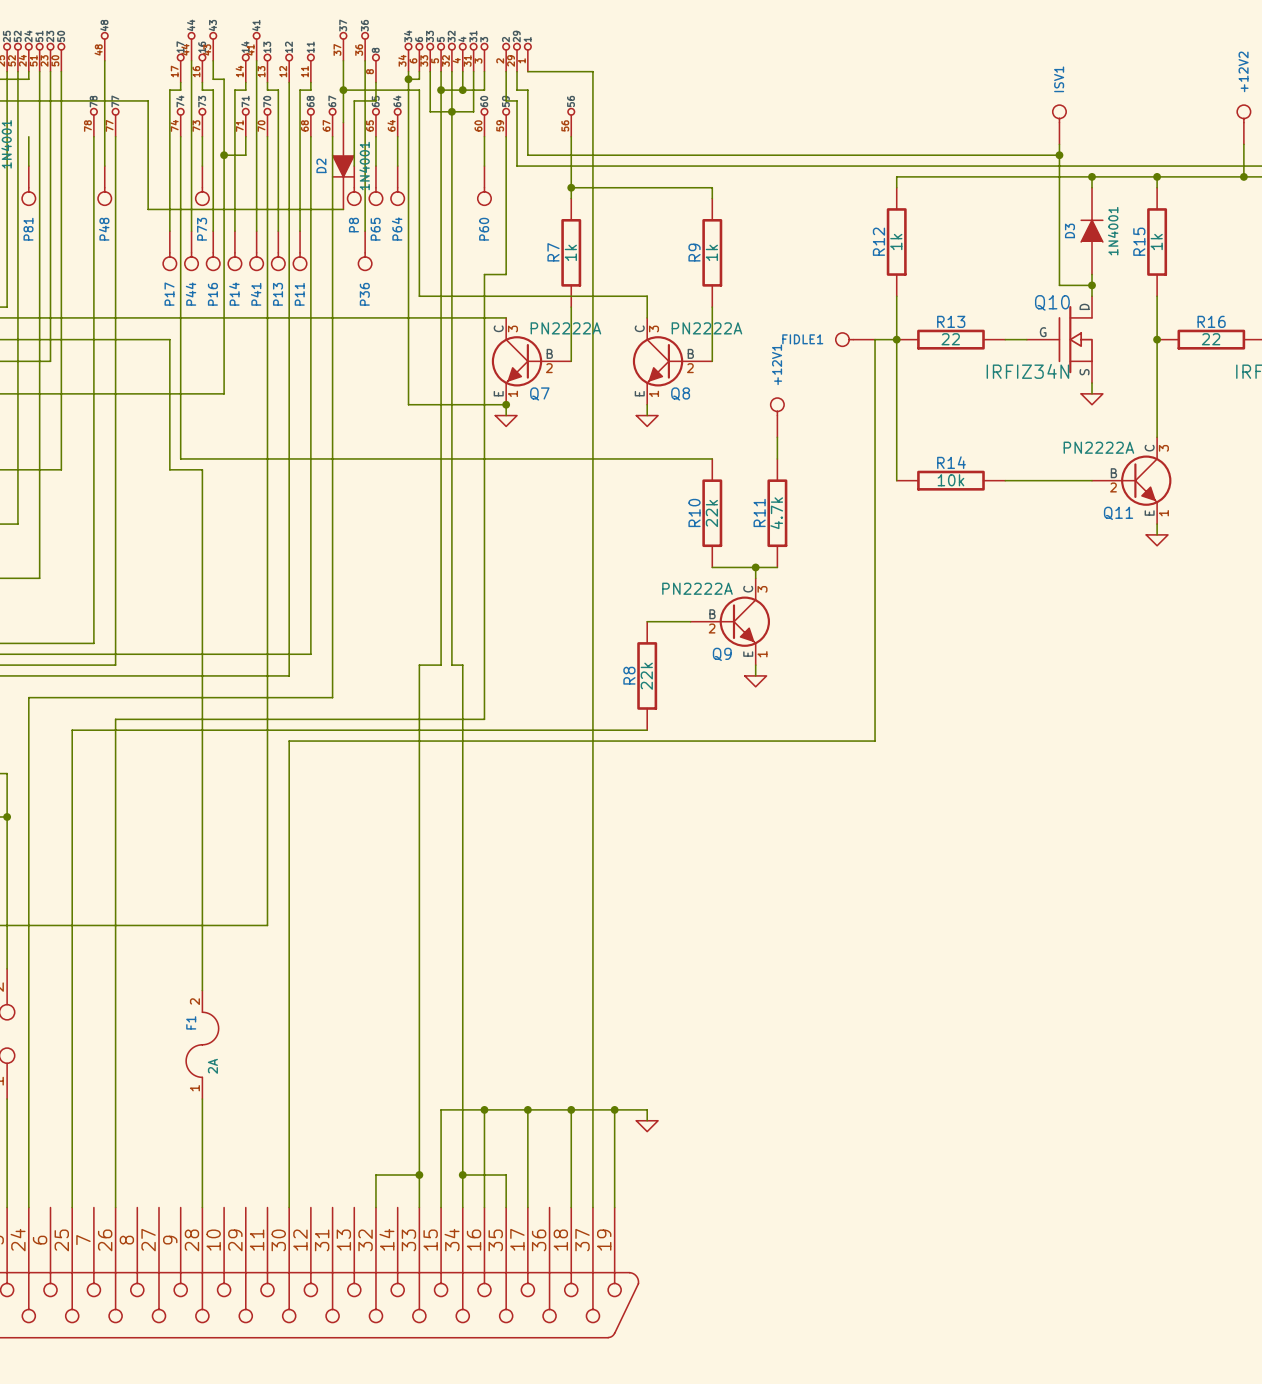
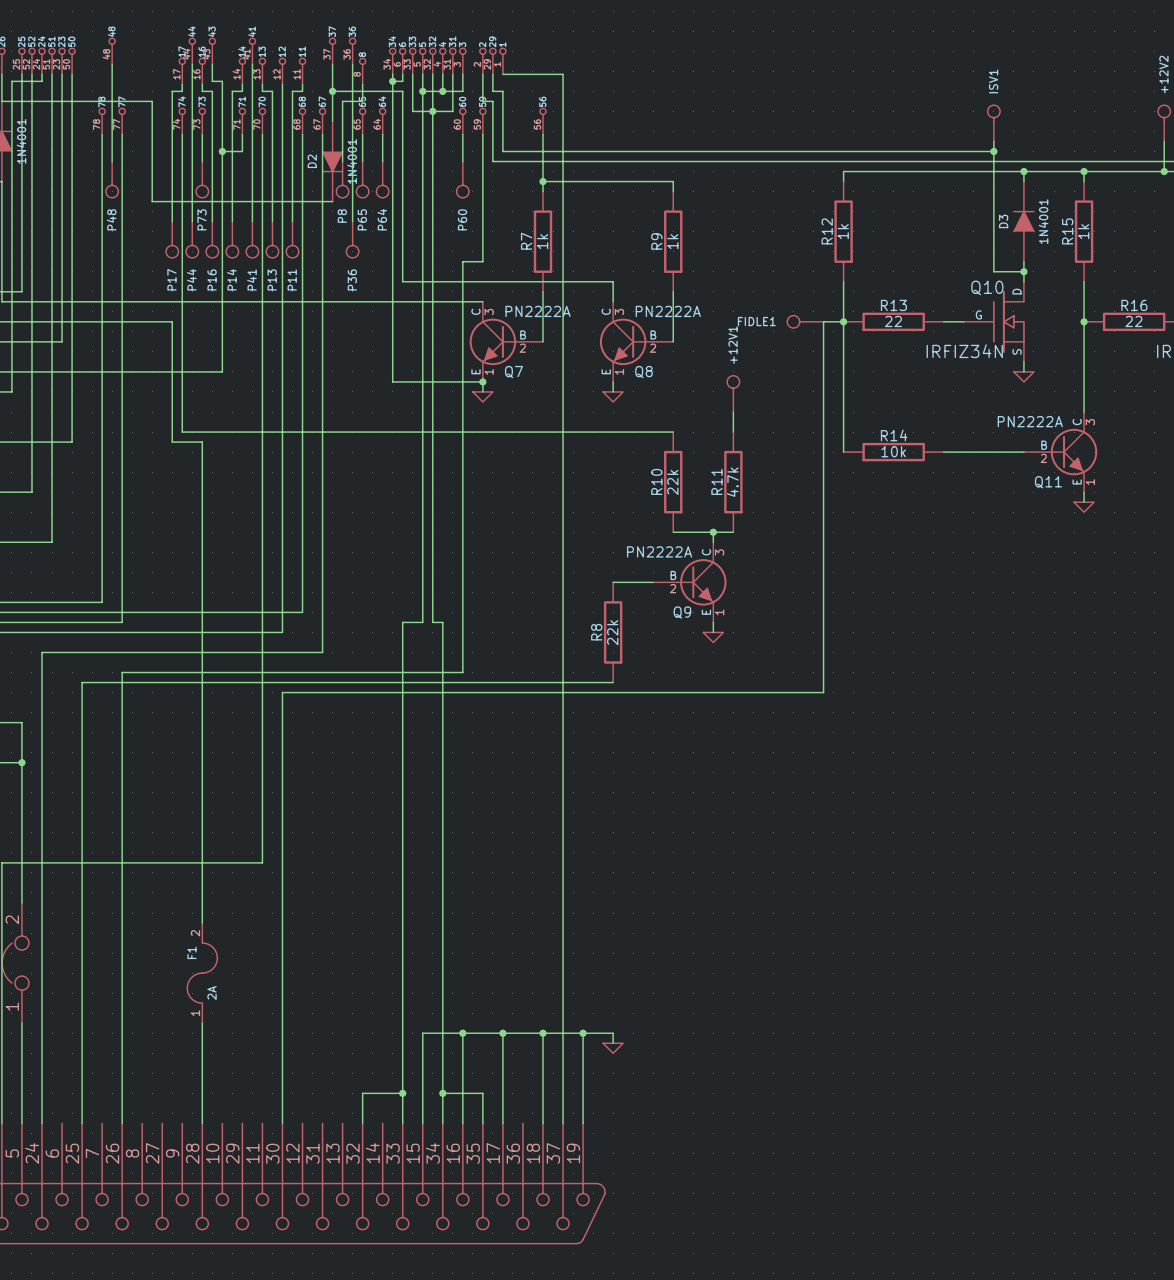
wire: (28, 136) (28, 166) -> none
P81: (28, 185) -> none

